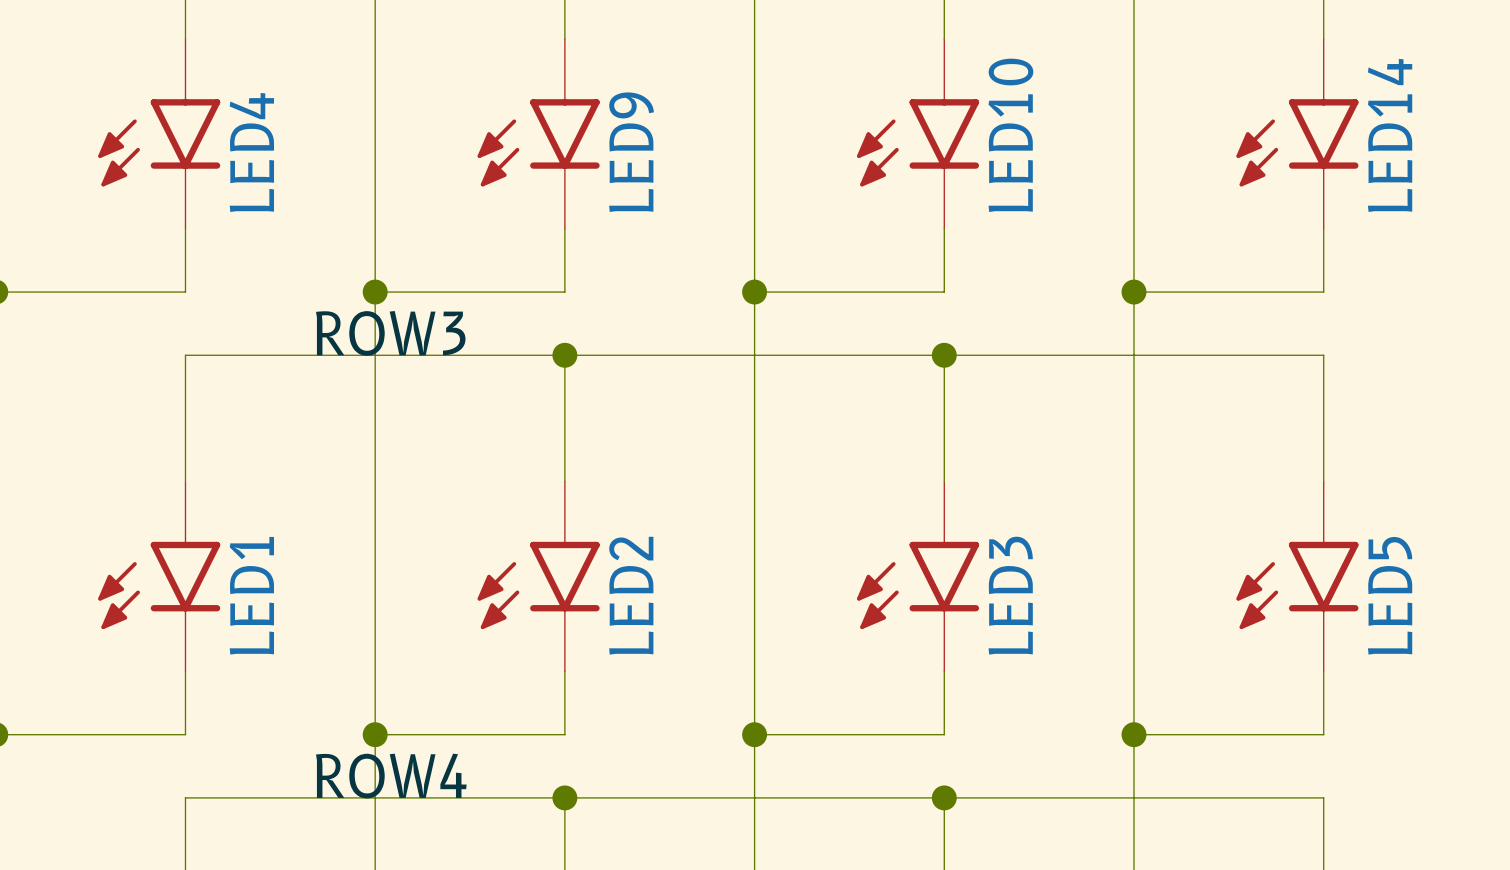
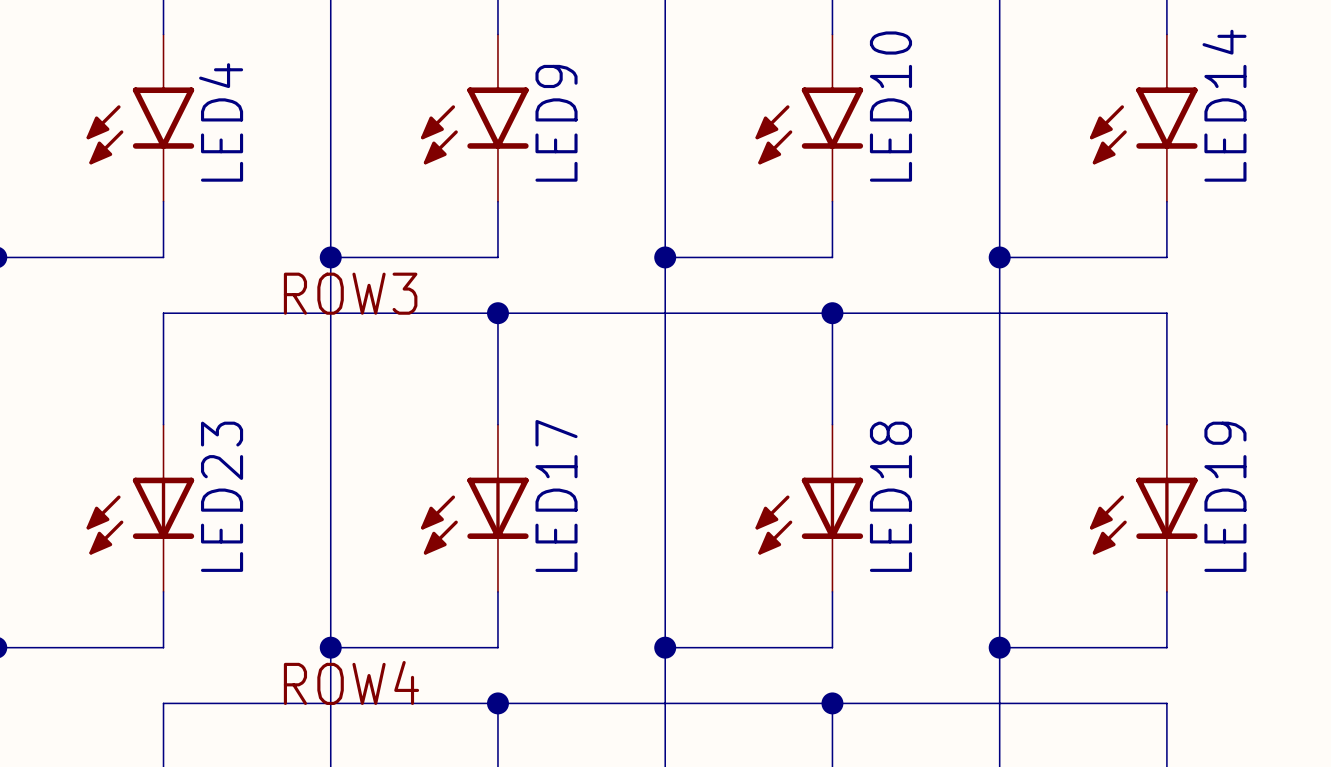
LED1: (159, 576) -> none
LED23: none -> (140, 508)
LED2: (538, 576) -> none
LED17: none -> (474, 508)
LED3: (918, 576) -> none
LED18: none -> (809, 508)
LED5: (1297, 576) -> none
LED19: none -> (1143, 508)

